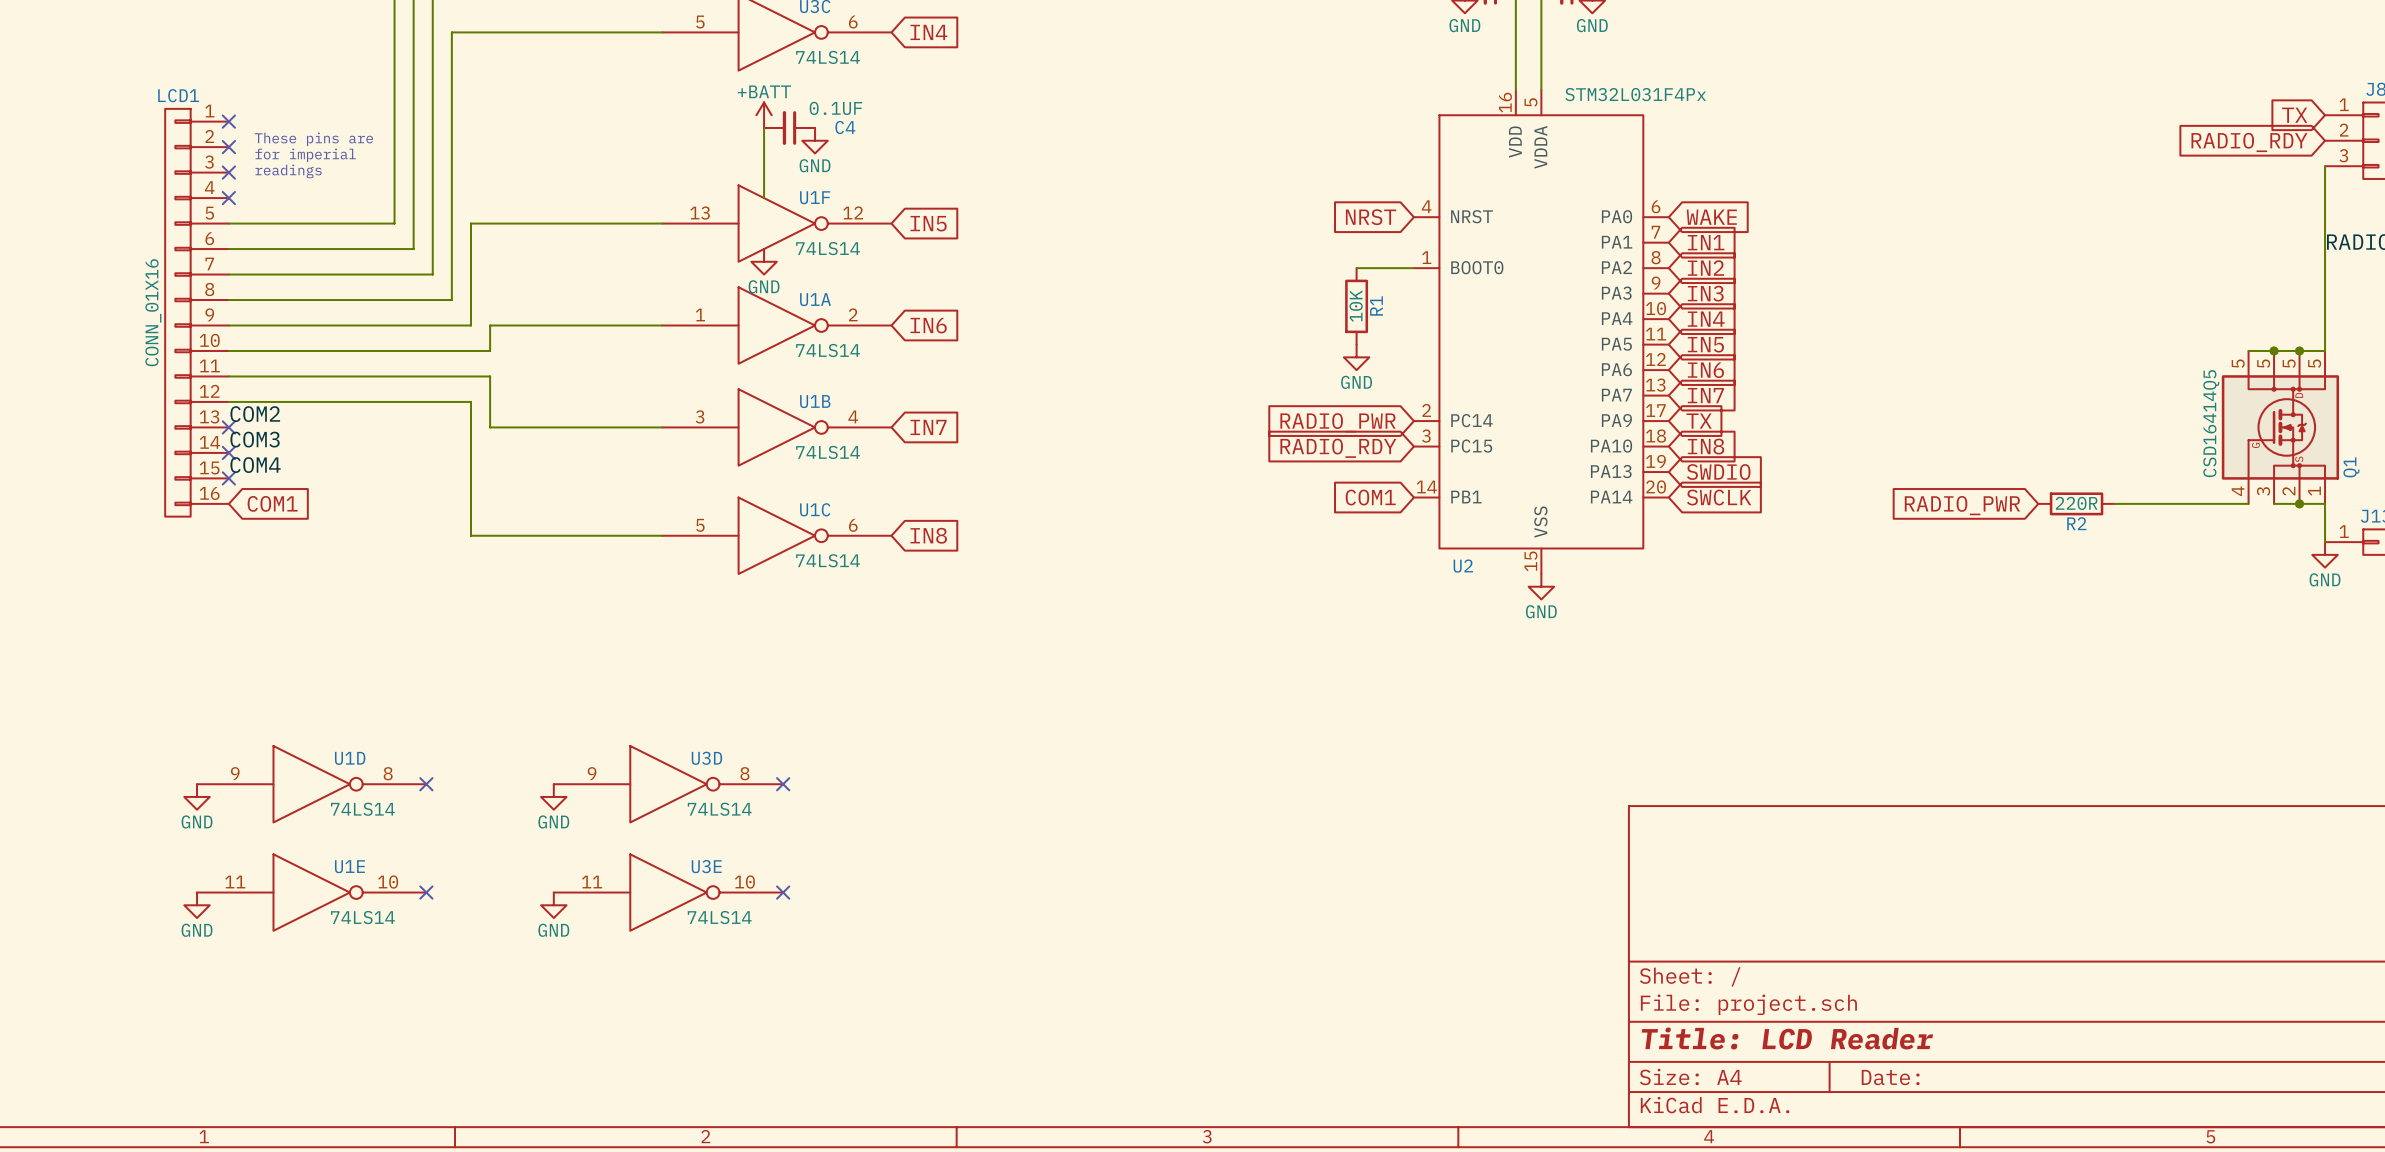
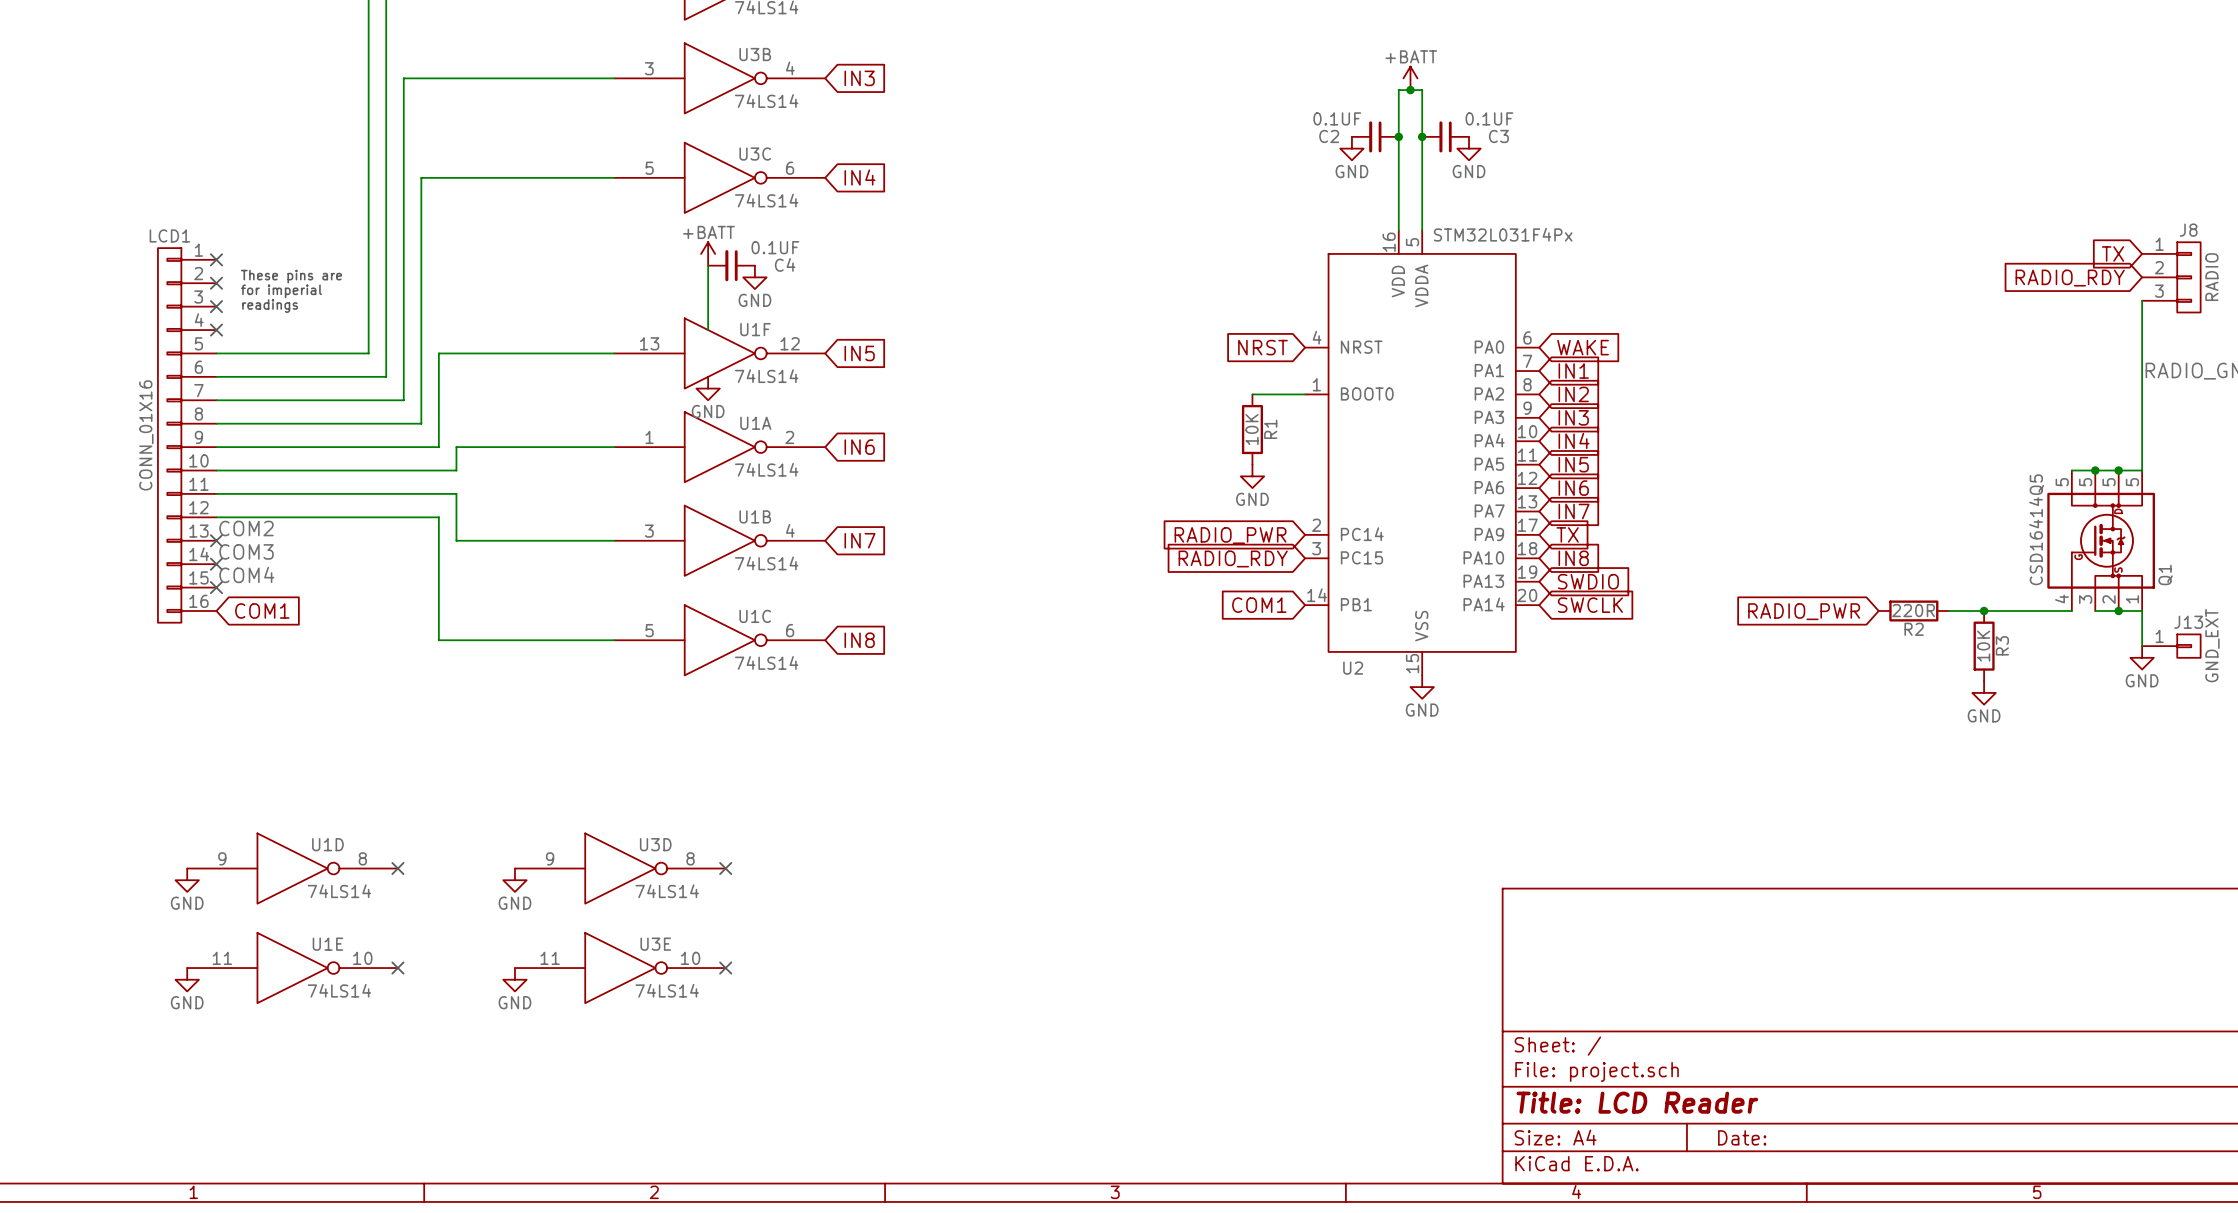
junction: none -> (1984, 610)
R3: none -> 10K (1984, 646)
power symbol: none -> GND (1984, 692)

